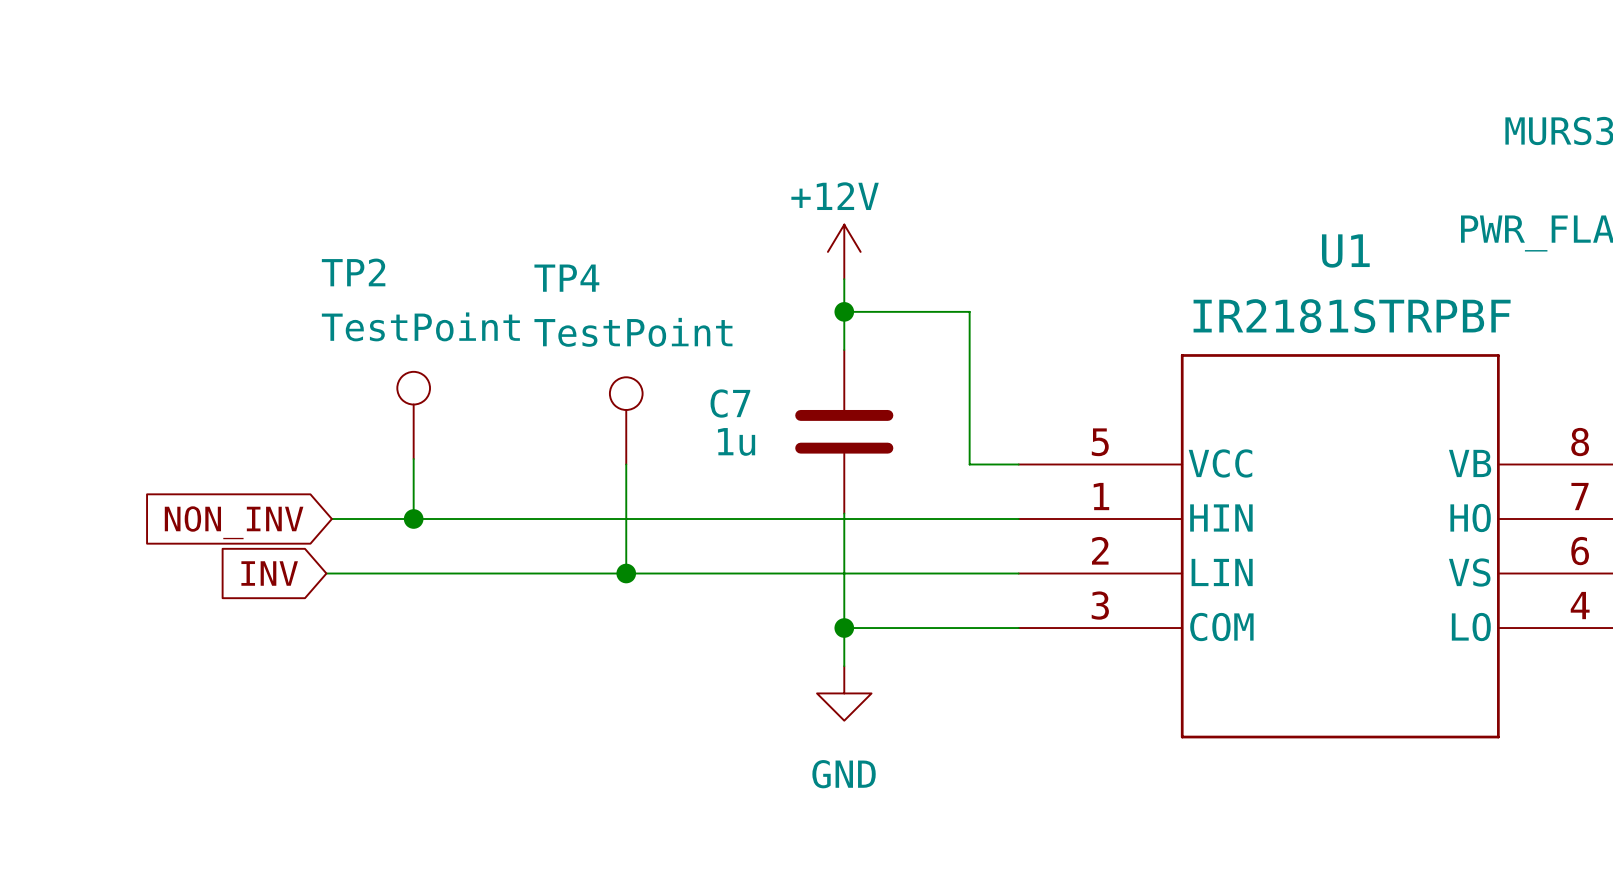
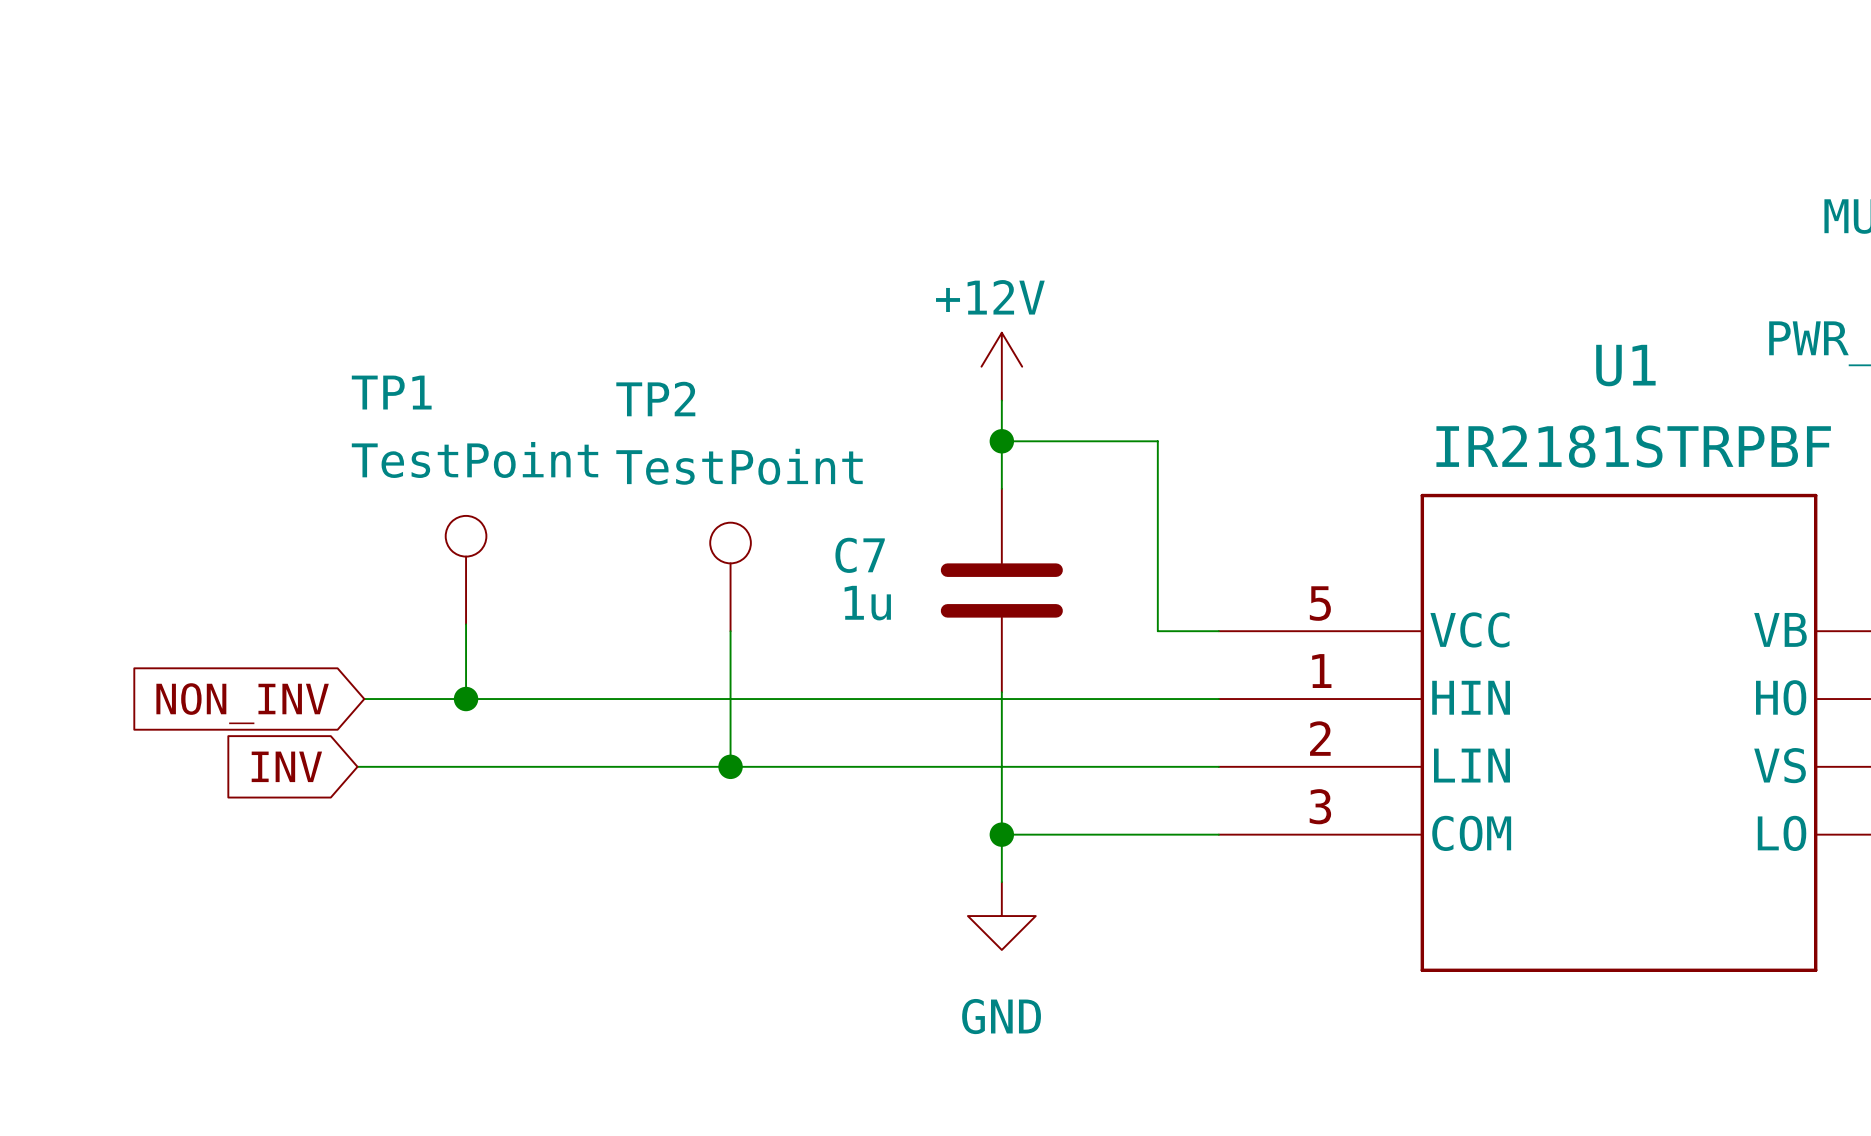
TP2 name: TP2 (353, 272) -> TP1 (391, 392)
TP4 name: TP4 (566, 278) -> TP2 (655, 399)

